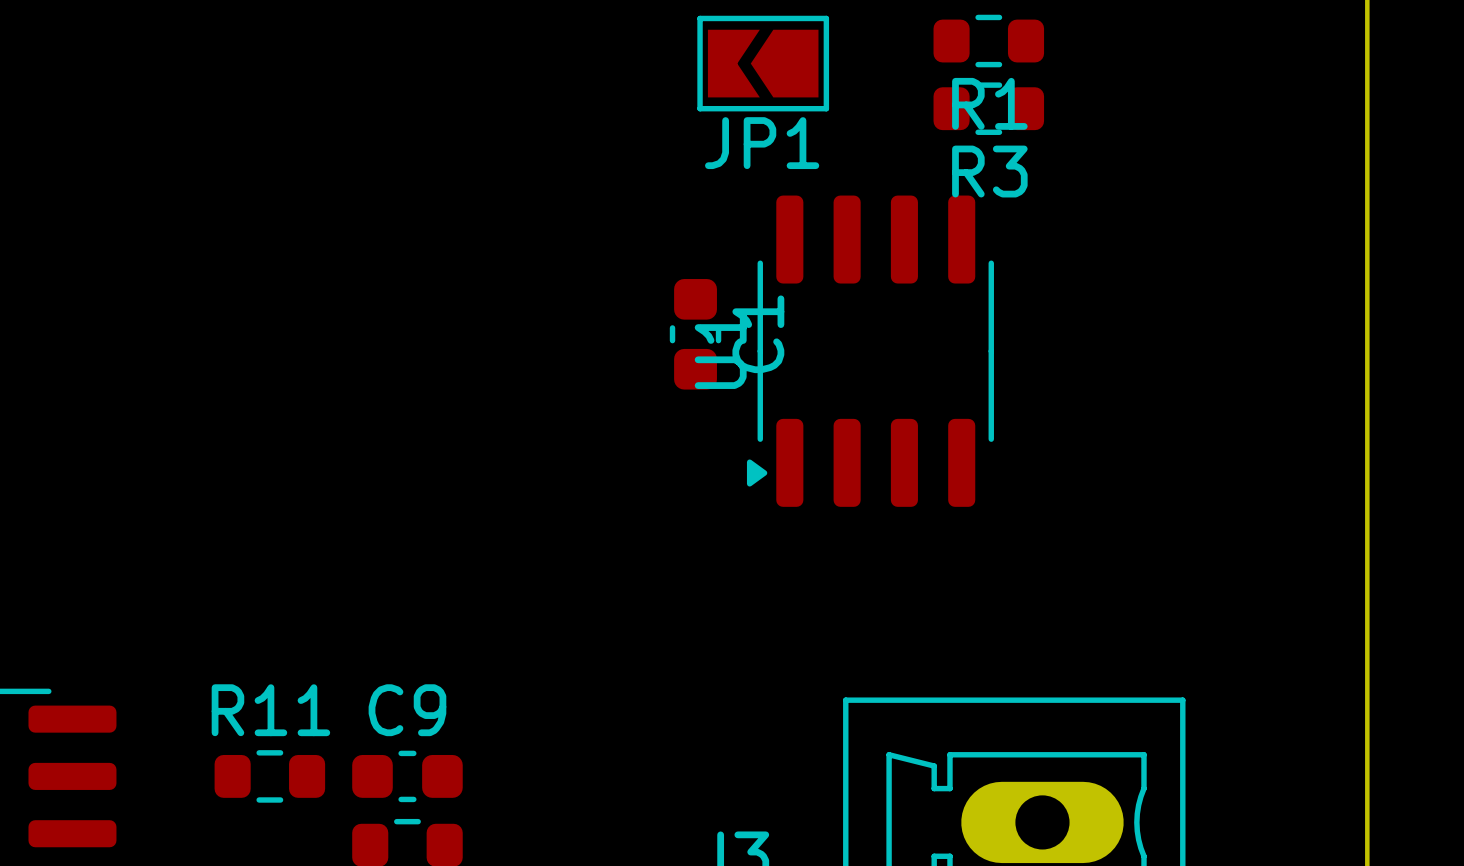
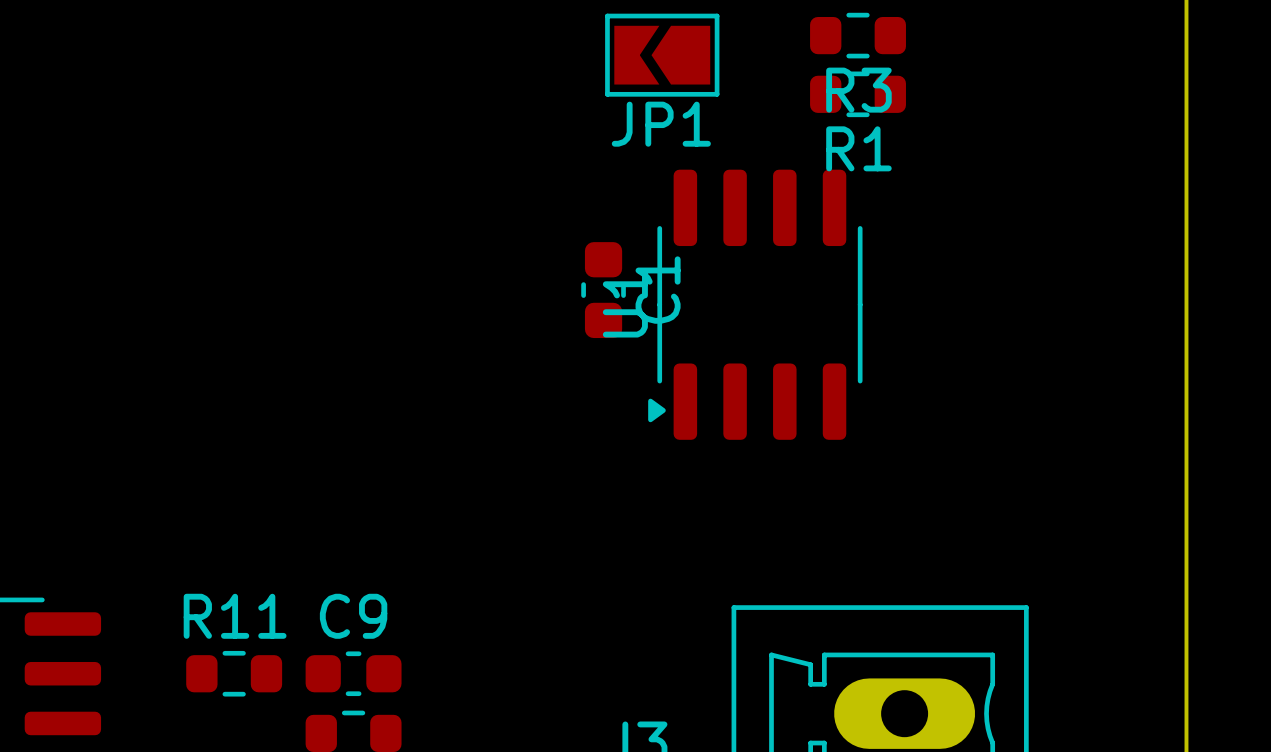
R1 name: R1 (989, 103) -> R3 (858, 90)
R3 name: R3 (989, 171) -> R1 (858, 148)

